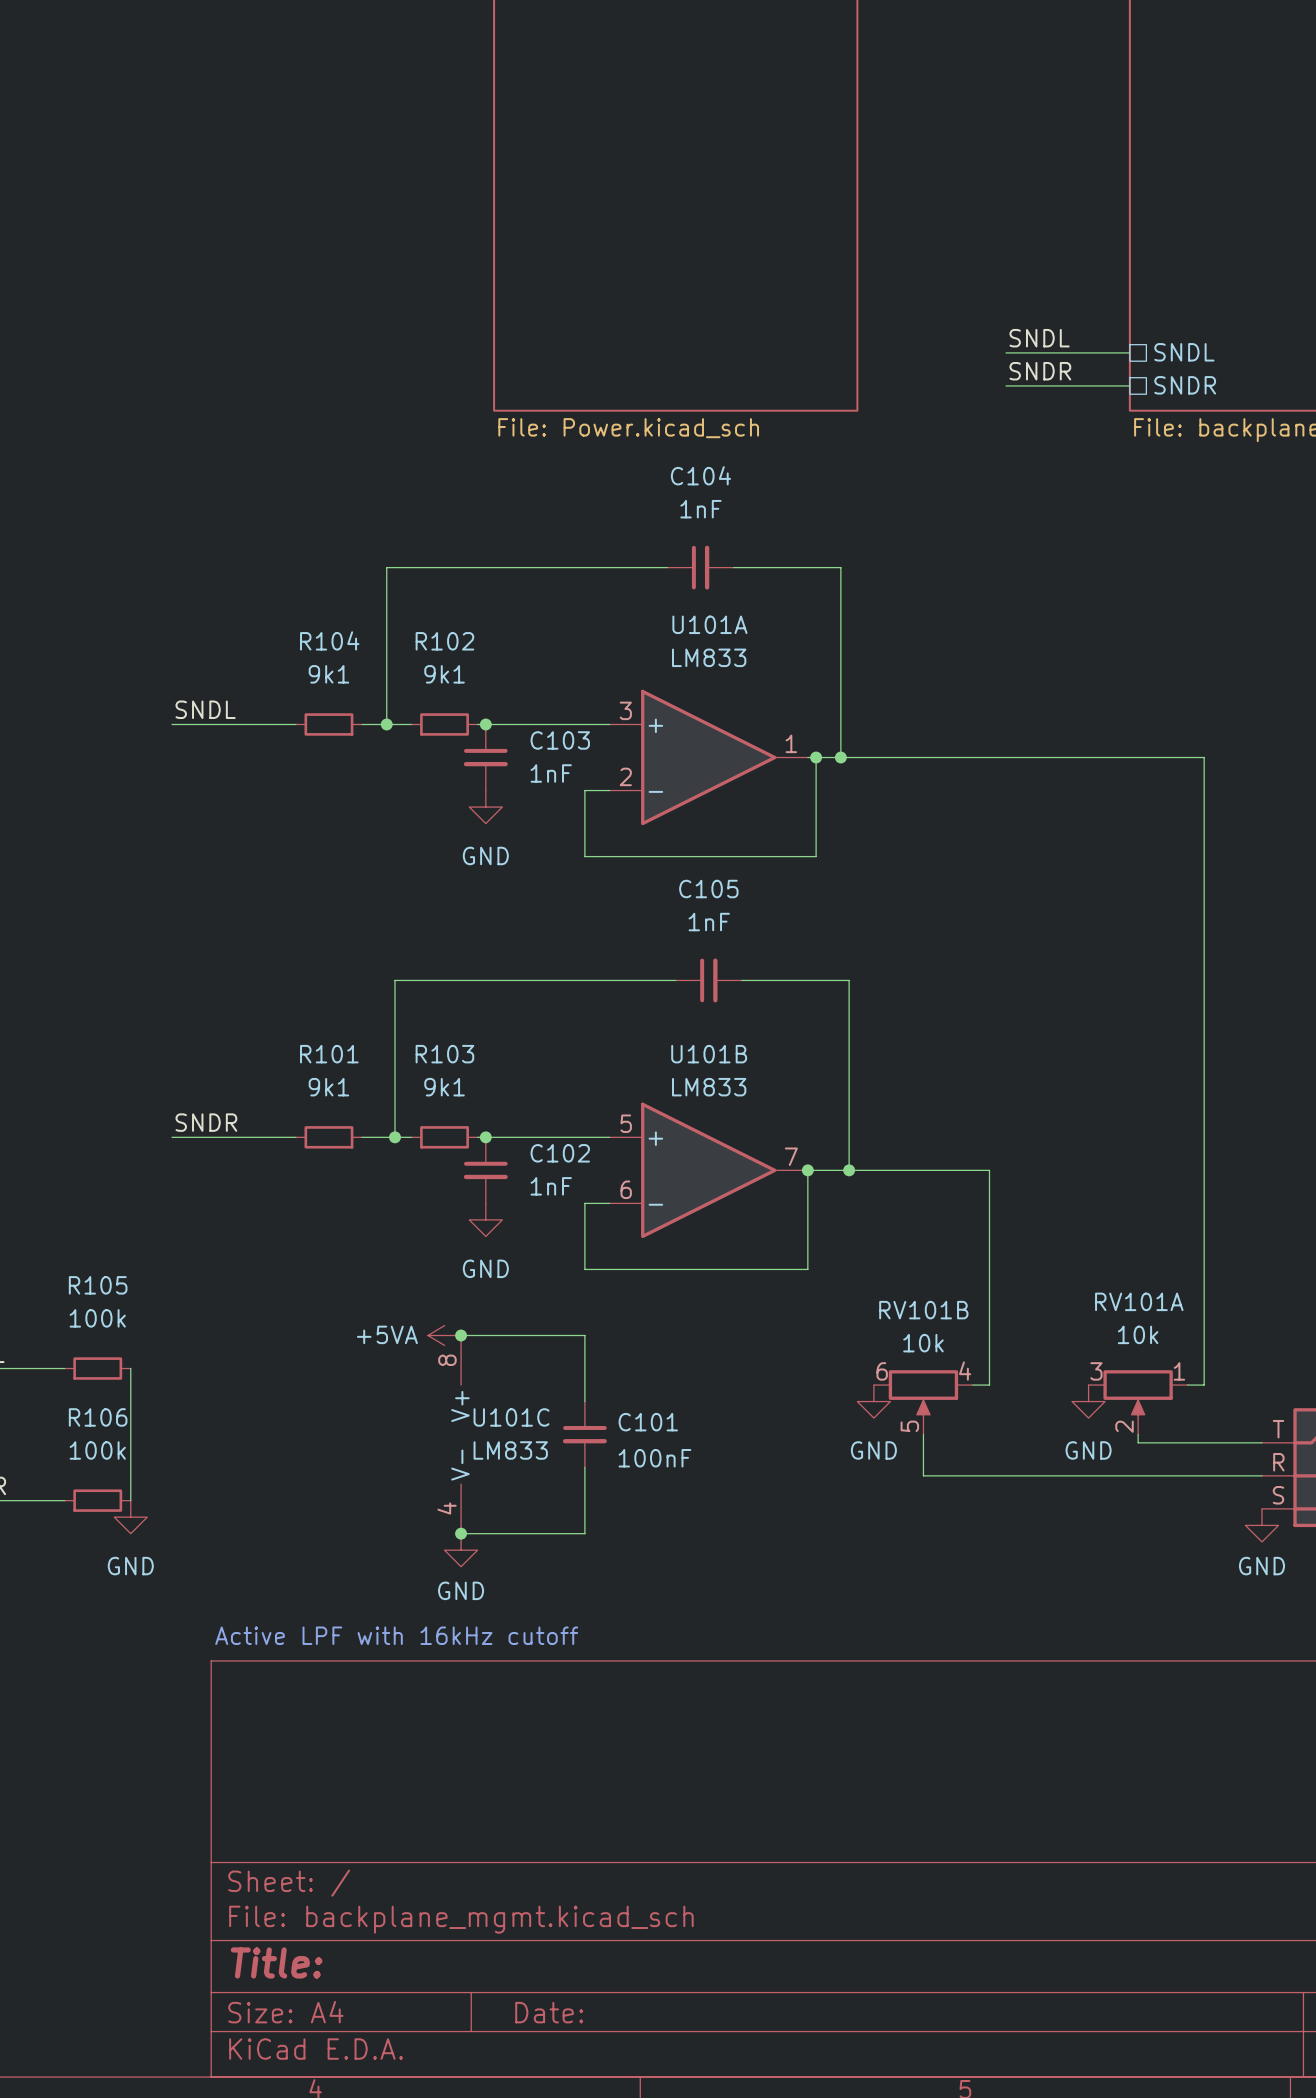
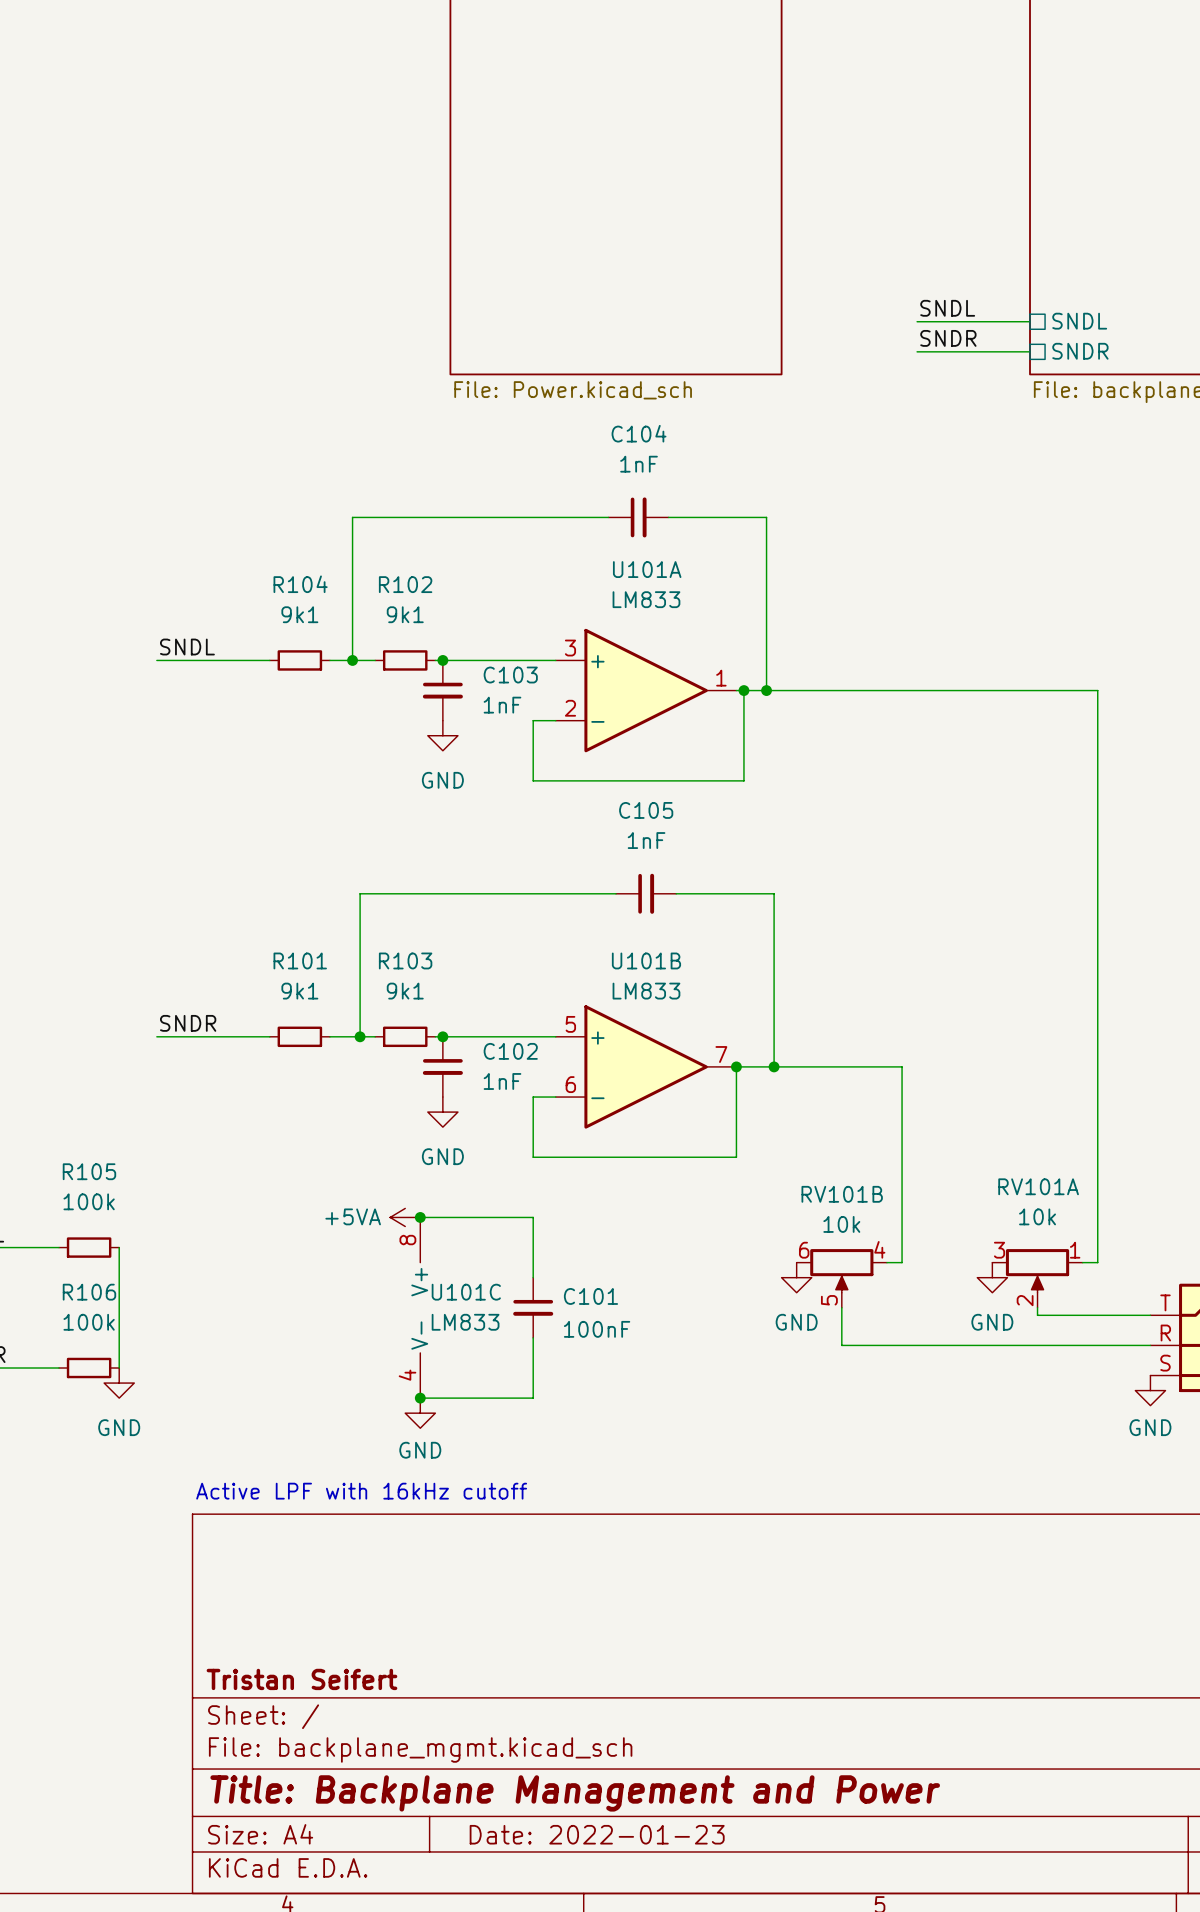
title block: none -> Tristan Seifert (301, 1679)
title block: Title: (276, 1962) -> Title: Backplane Management and Power (575, 1793)
title block: Date: (549, 2012) -> Date: 2022-01-23 (597, 1834)

